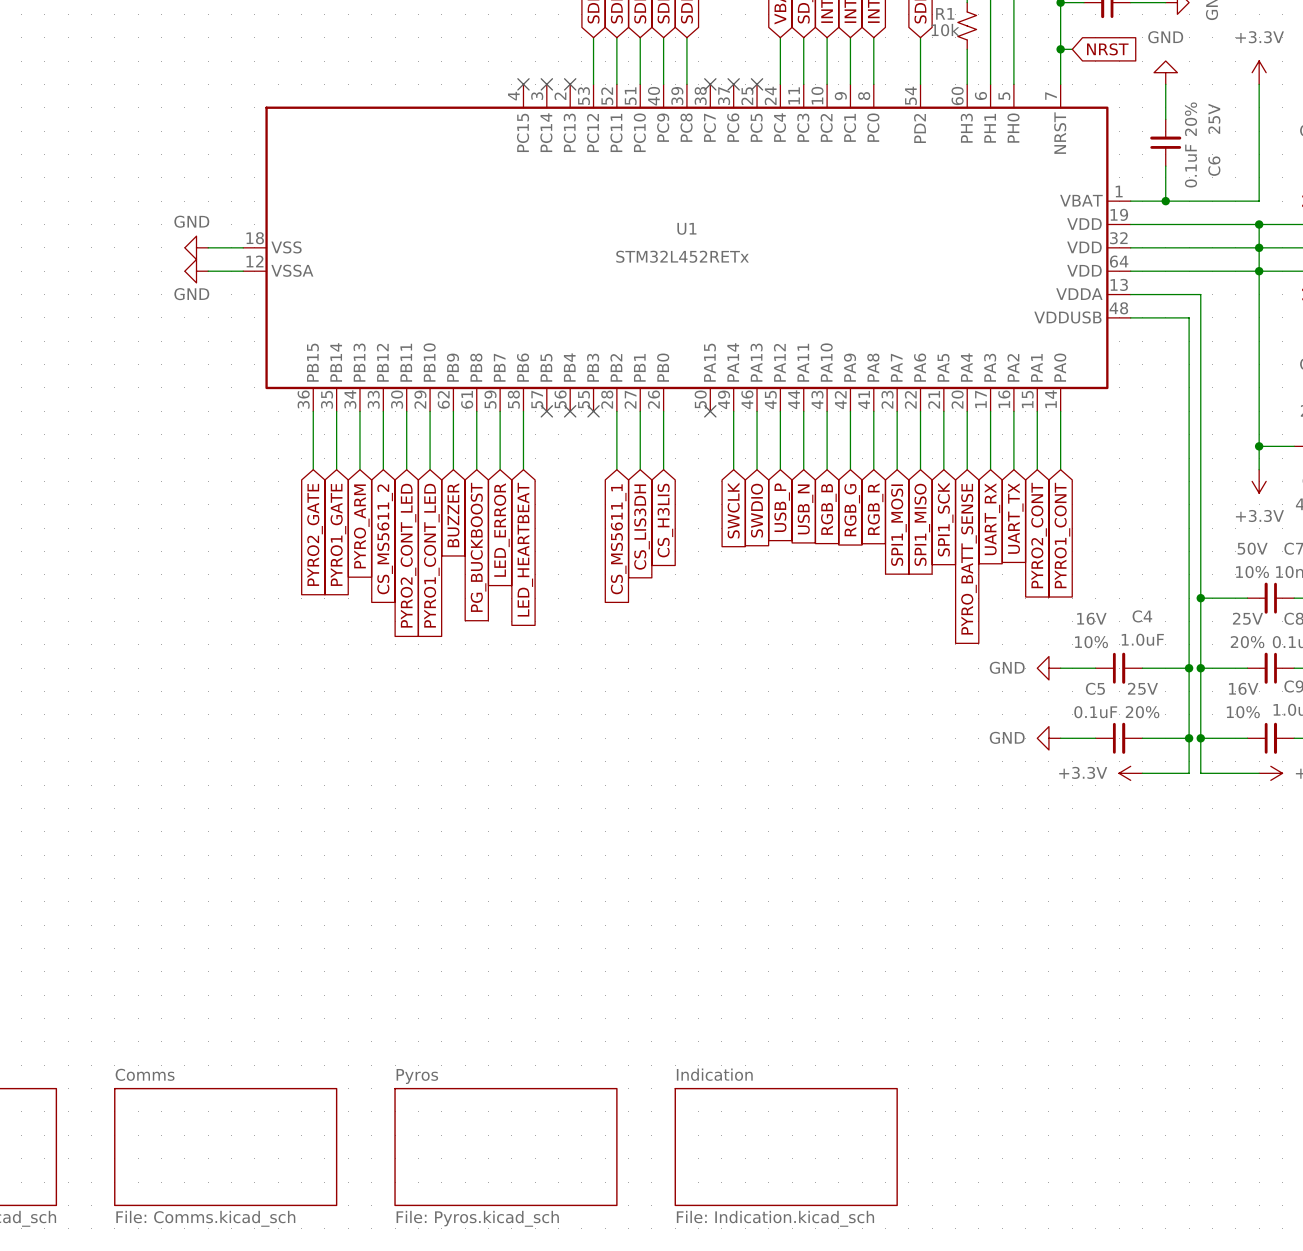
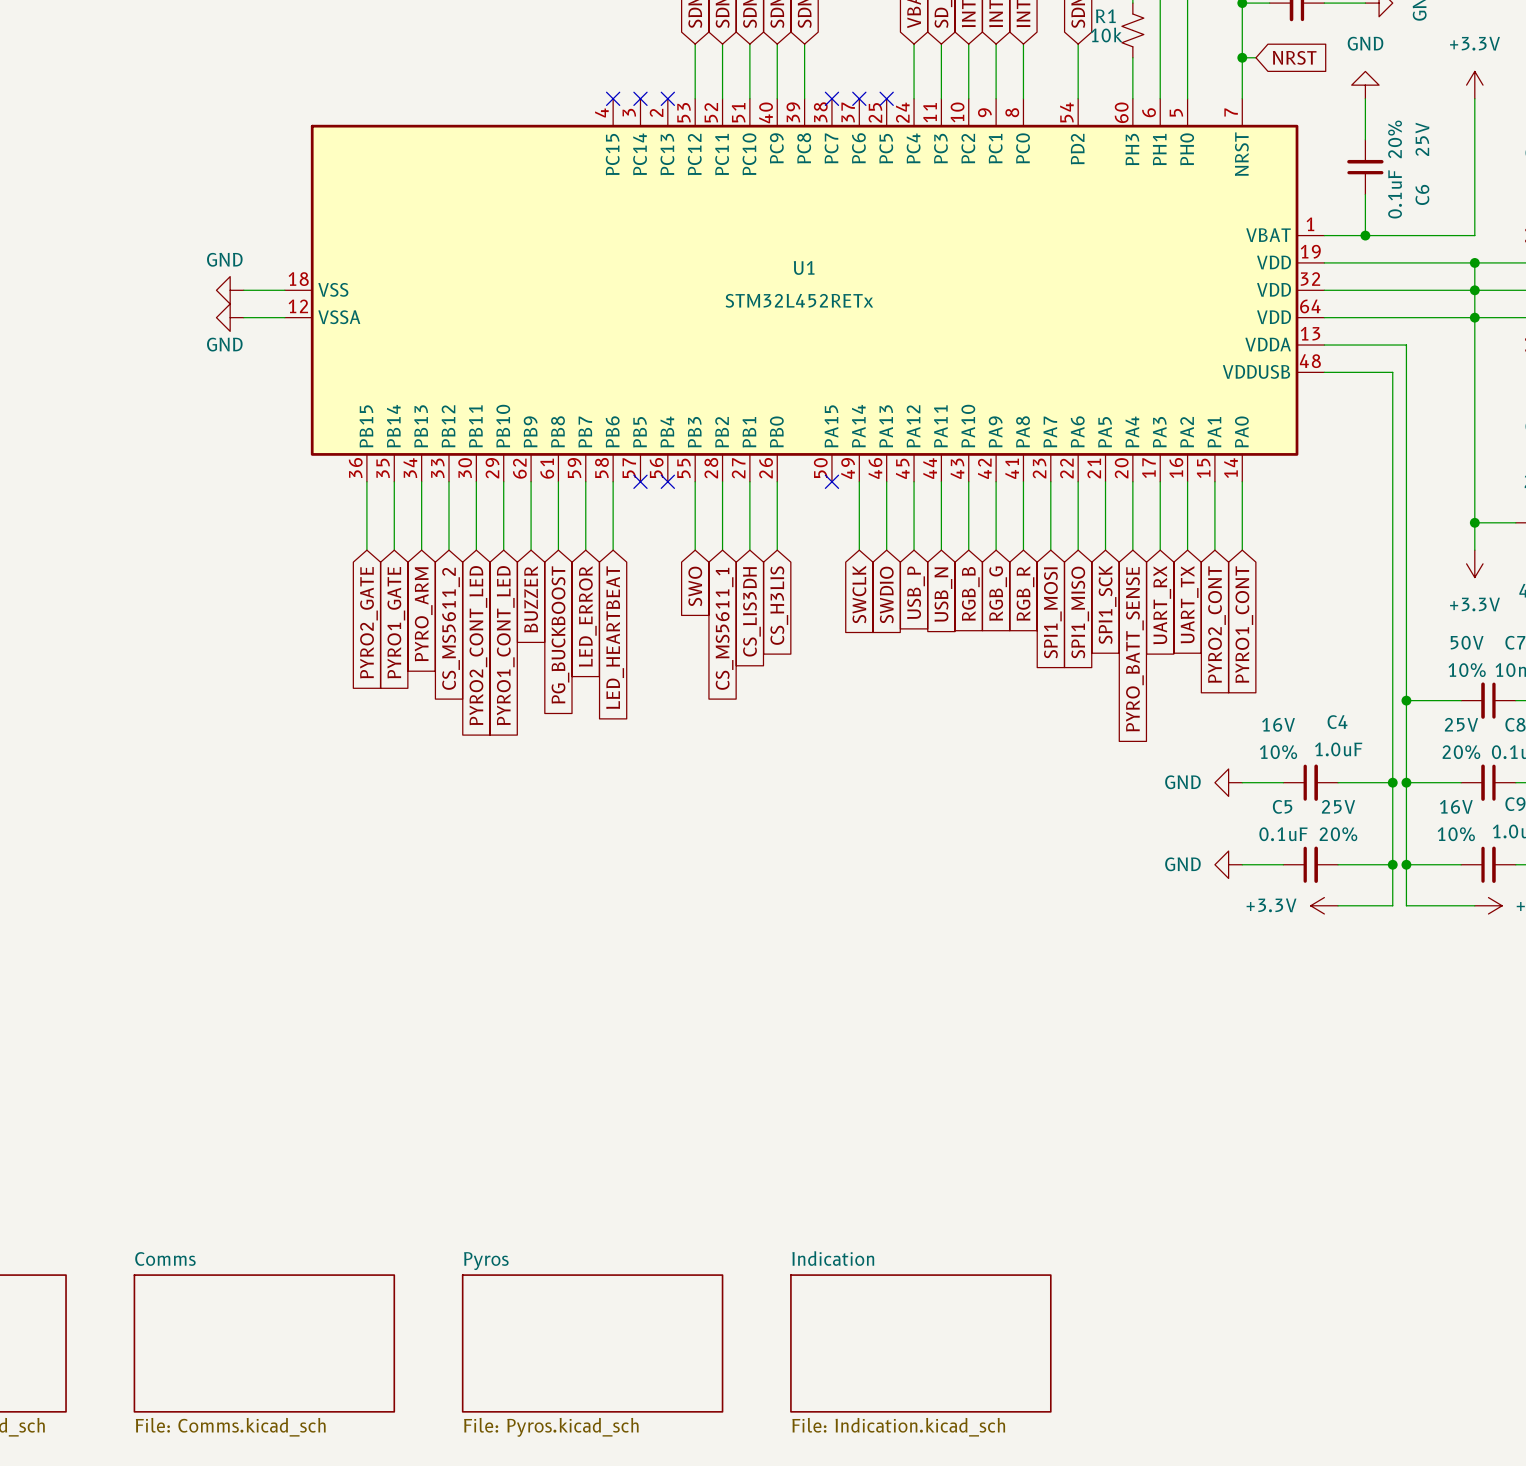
wire: none -> (695, 481) (695, 550)
no-connect mark: (593, 411) -> none
global label: none -> SWO (695, 586)

